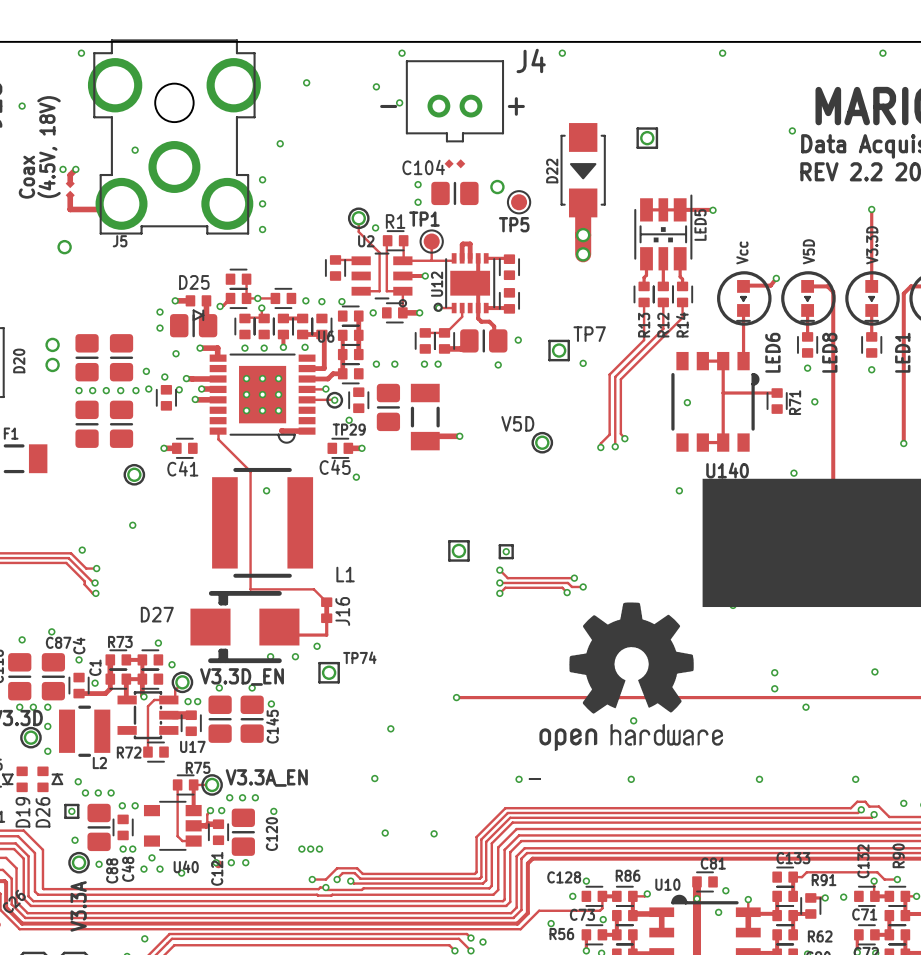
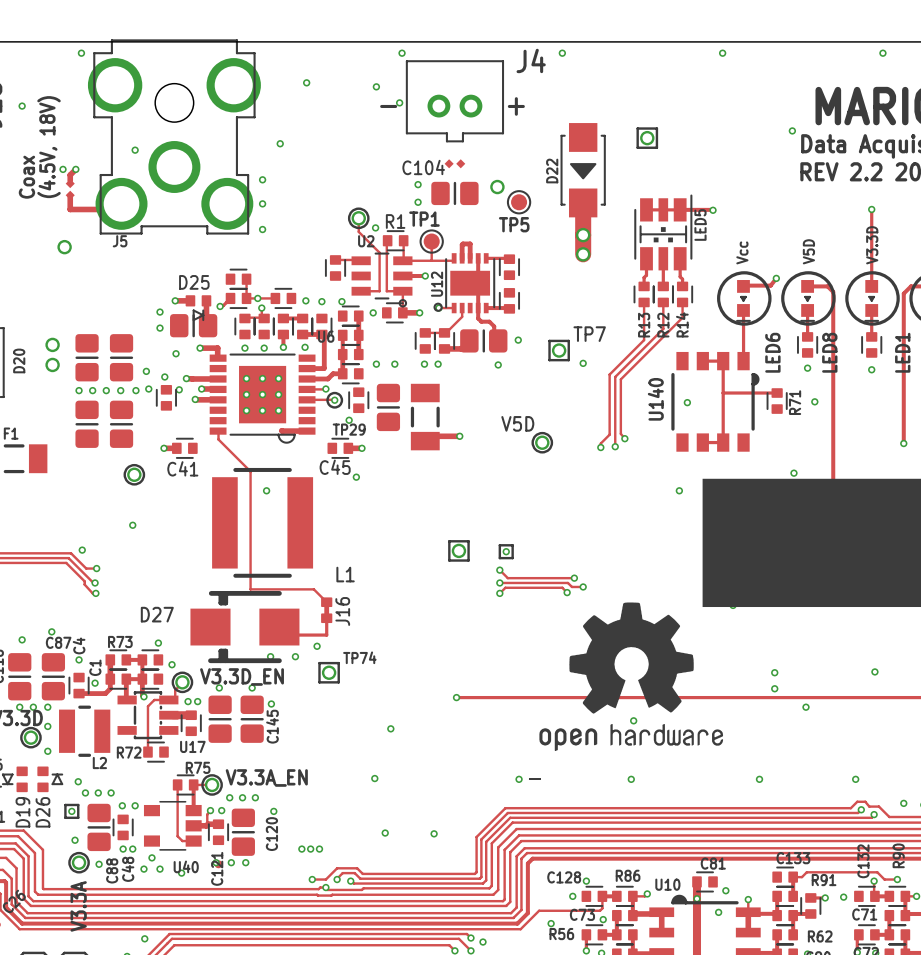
U140 name rotation: 0° (727, 470) -> 90° counterclockwise (655, 399)
U140 name position: U140 (727, 470) -> U140 (655, 399)

